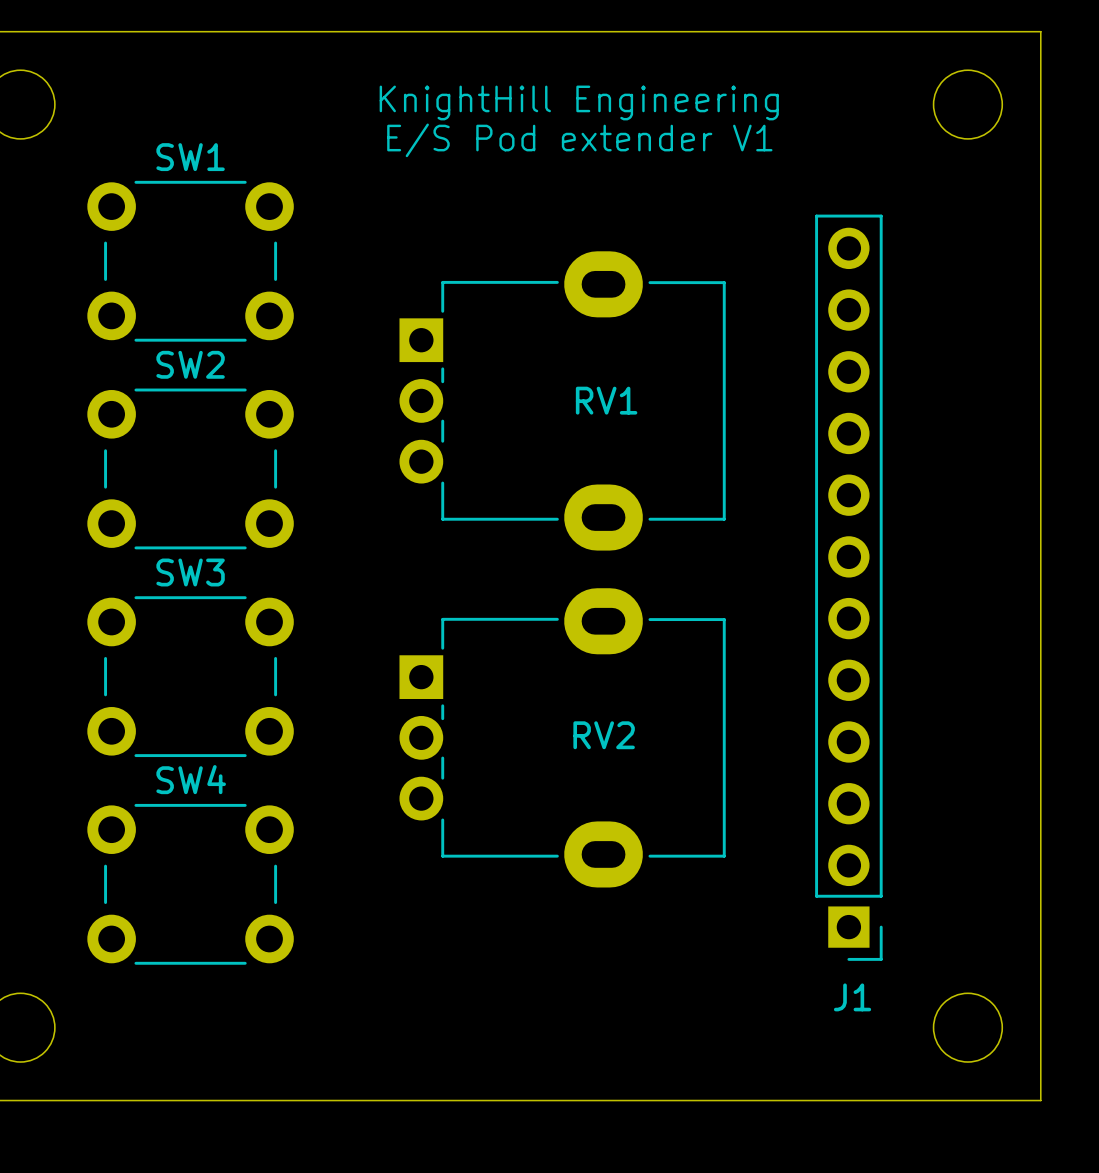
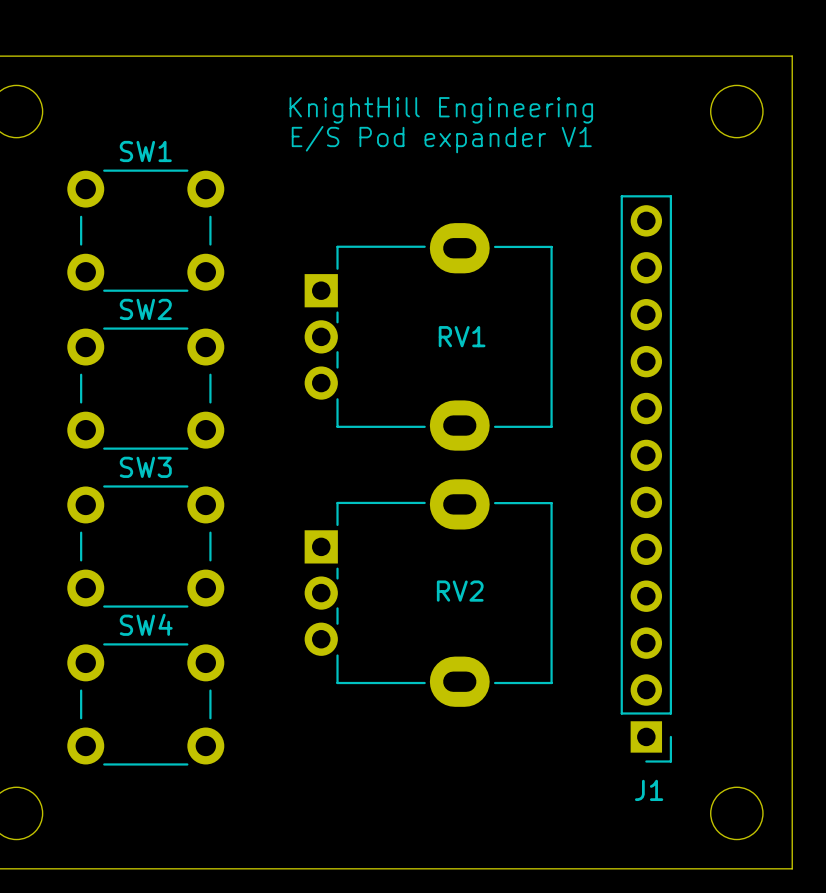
text: E/S Pod extender V1 (579, 140) -> E/S Pod expander V1 (441, 139)

